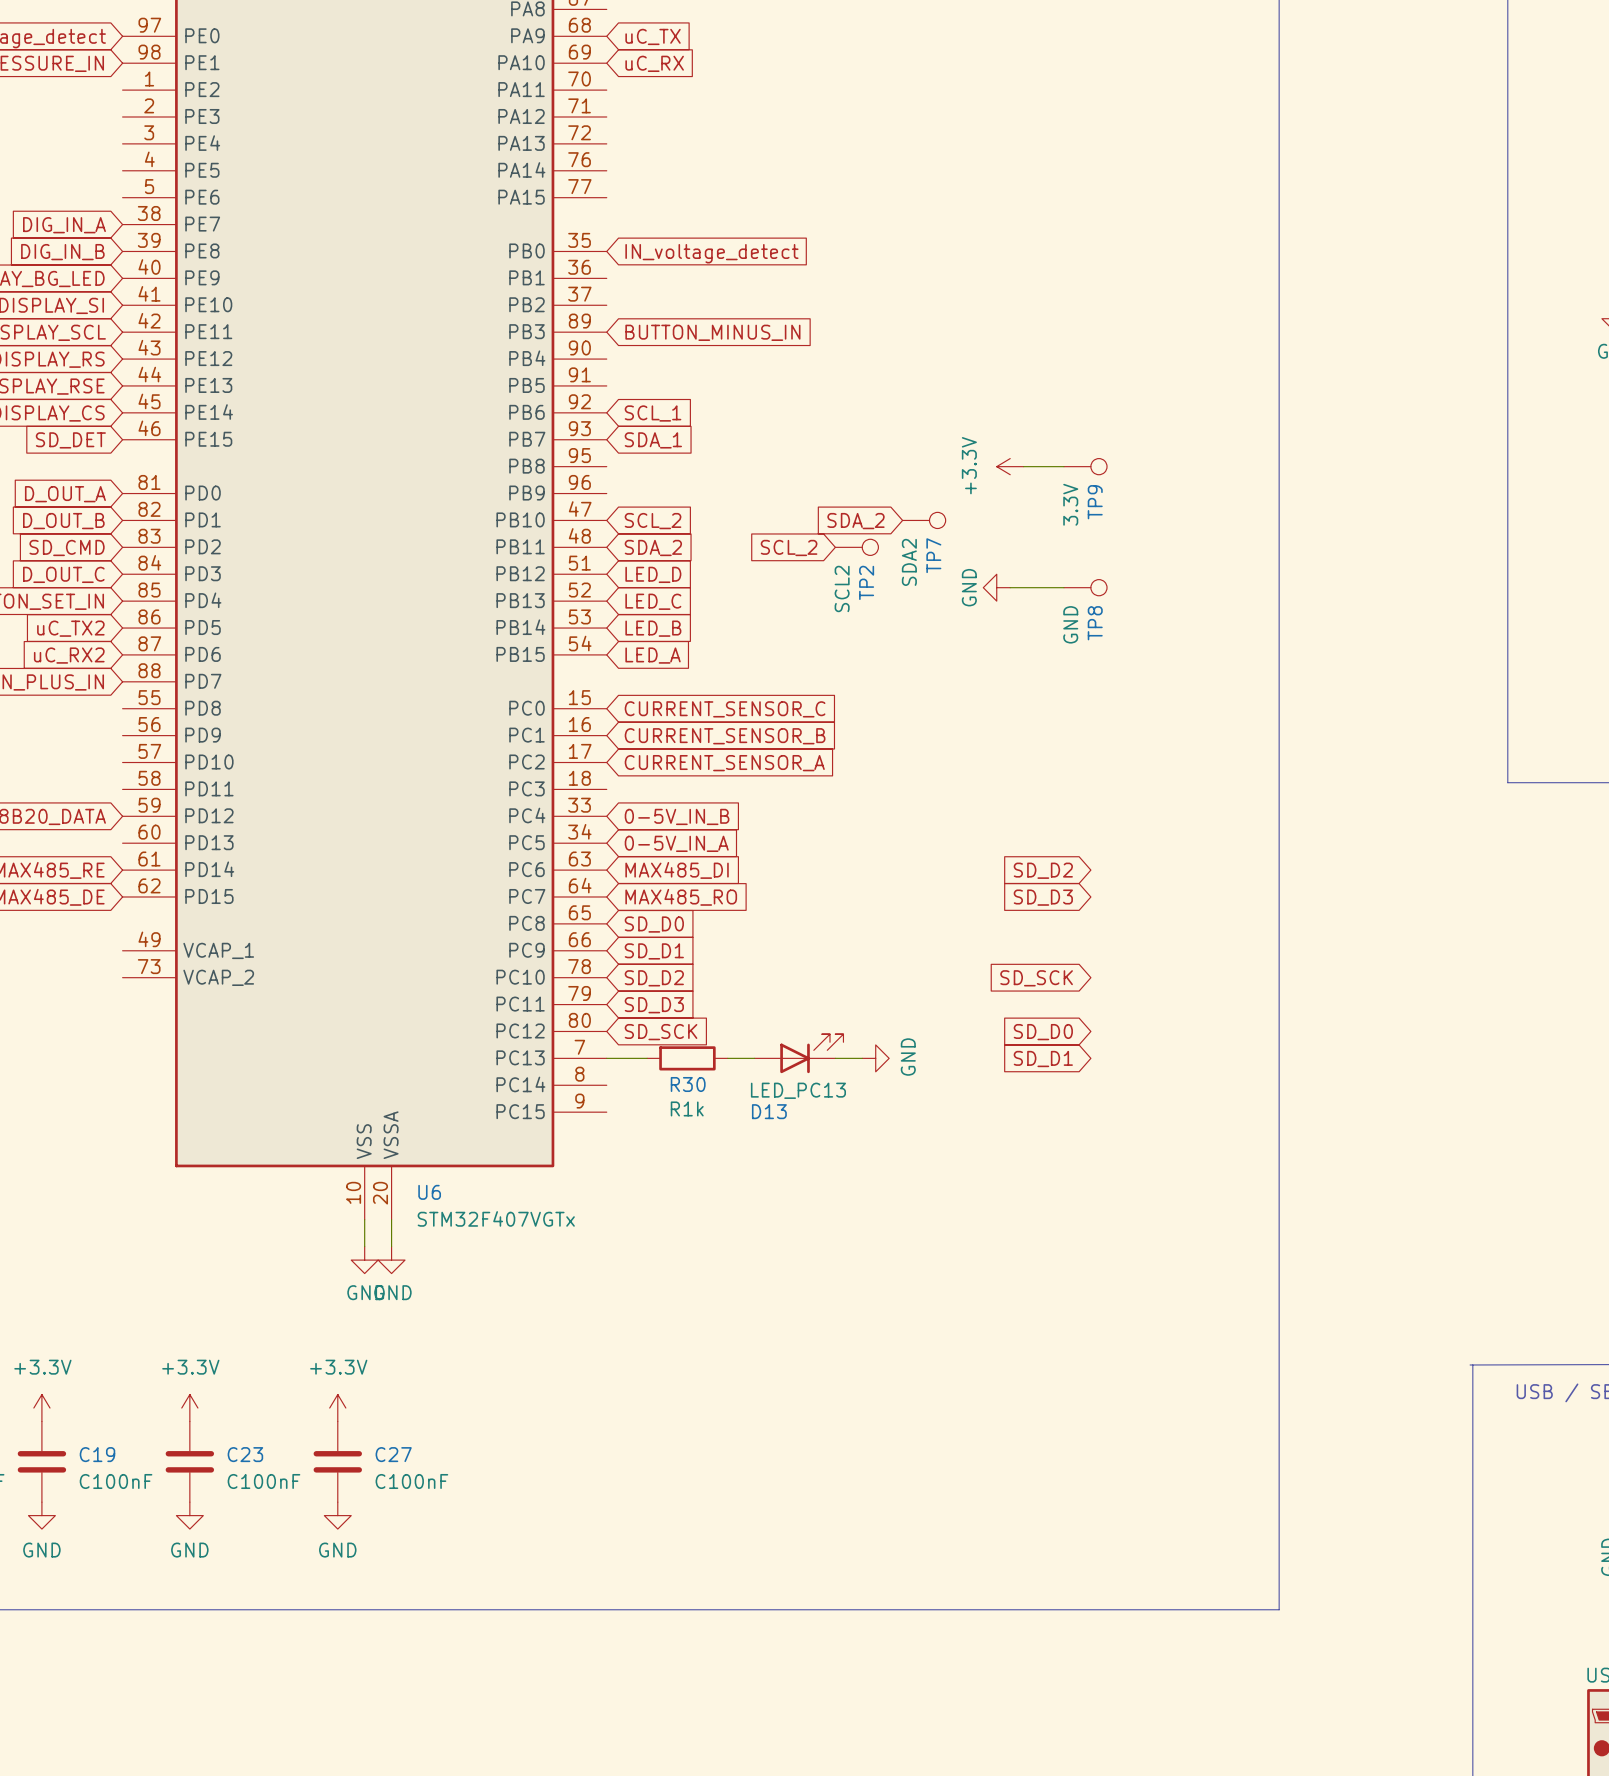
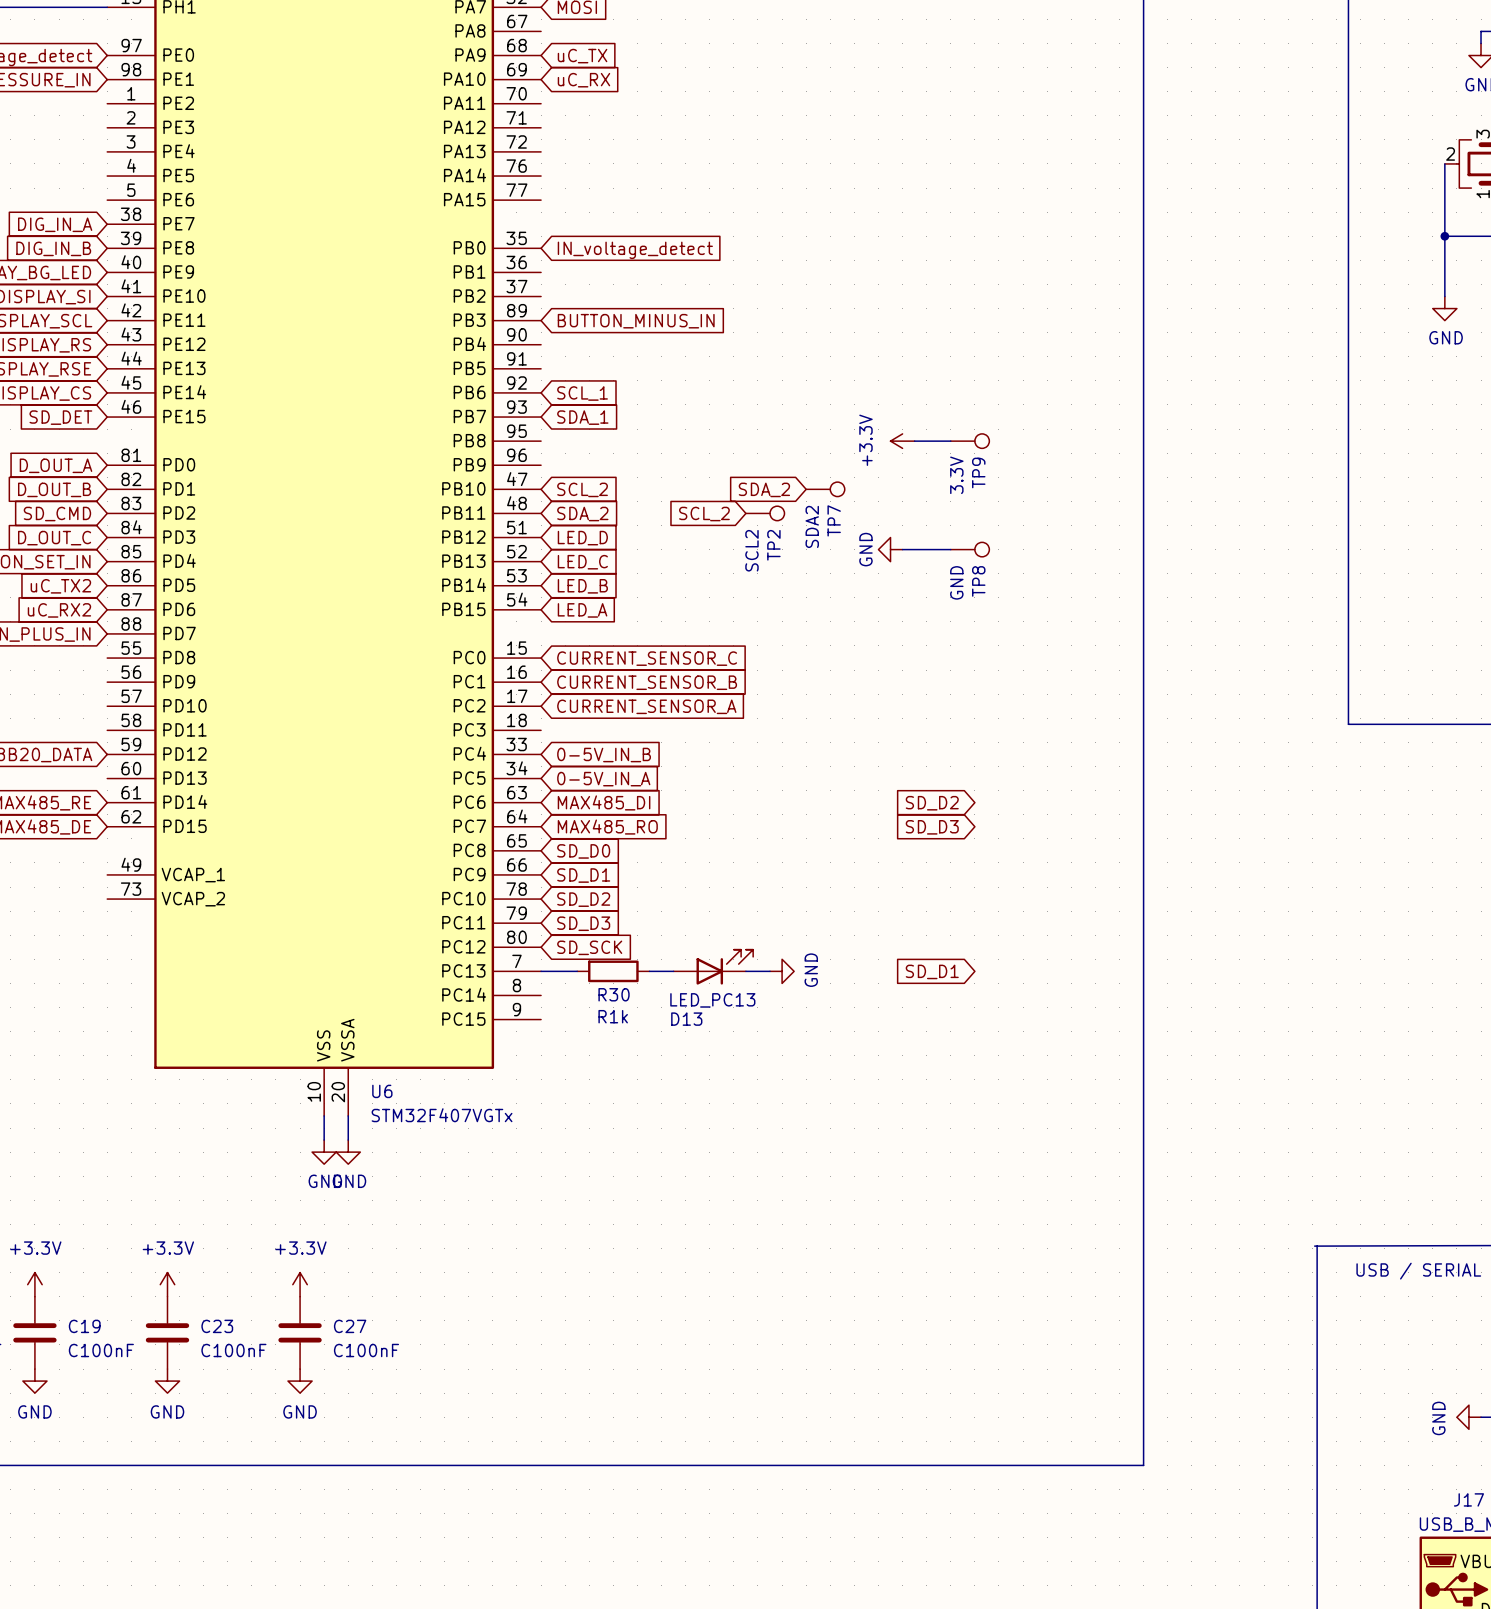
global label: SD_SCK (1036, 978) -> none
global label: SD_D0 (1043, 1032) -> none

